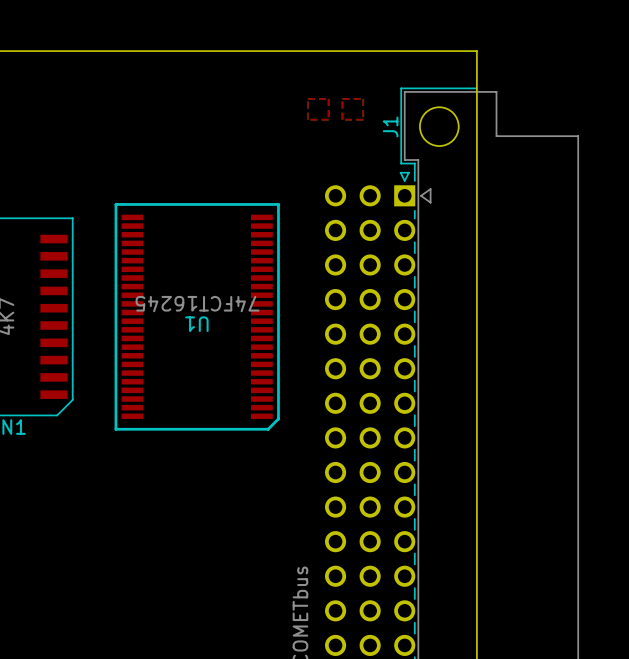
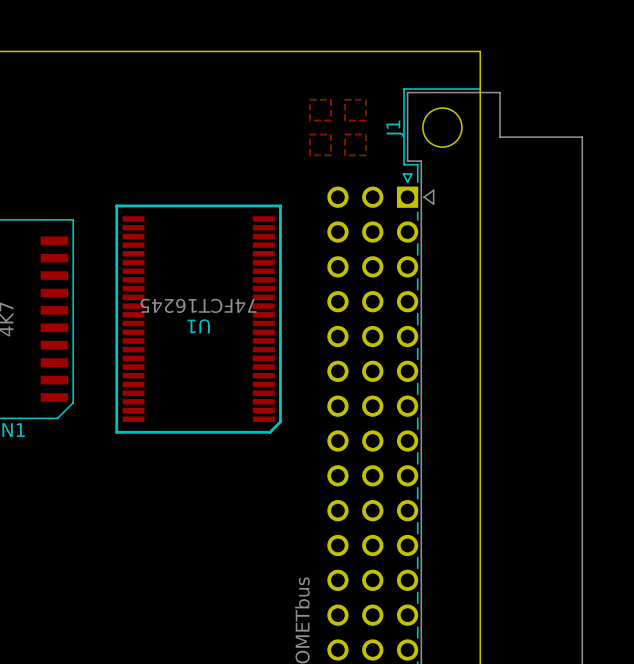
top zone outline: none -> (310, 134) (330, 134) (330, 155) (310, 155) (310, 134)
top zone outline: none -> (344, 134) (365, 134) (365, 155) (344, 155) (344, 134)

